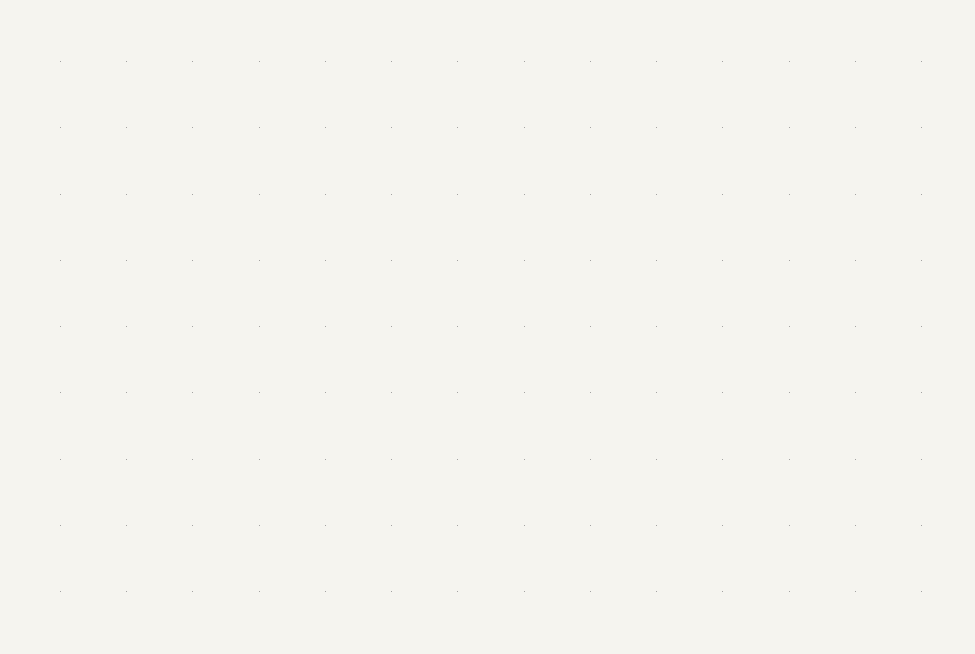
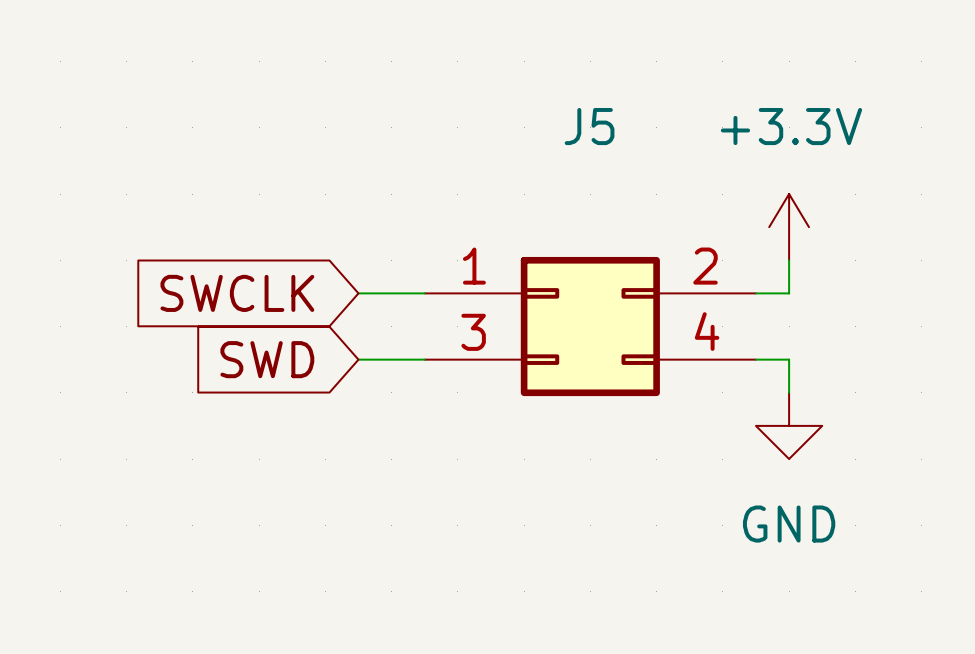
power symbol: none -> +3.3V (789, 227)
wire: none -> (789, 260) (789, 293) (755, 293)
global label: none -> SWCLK (237, 293)
wire: none -> (358, 293) (424, 293)
J5: none -> (590, 326)
global label: none -> SWD (267, 359)
wire: none -> (358, 359) (424, 359)
wire: none -> (755, 359) (789, 359) (789, 392)
power symbol: none -> GND (789, 425)

